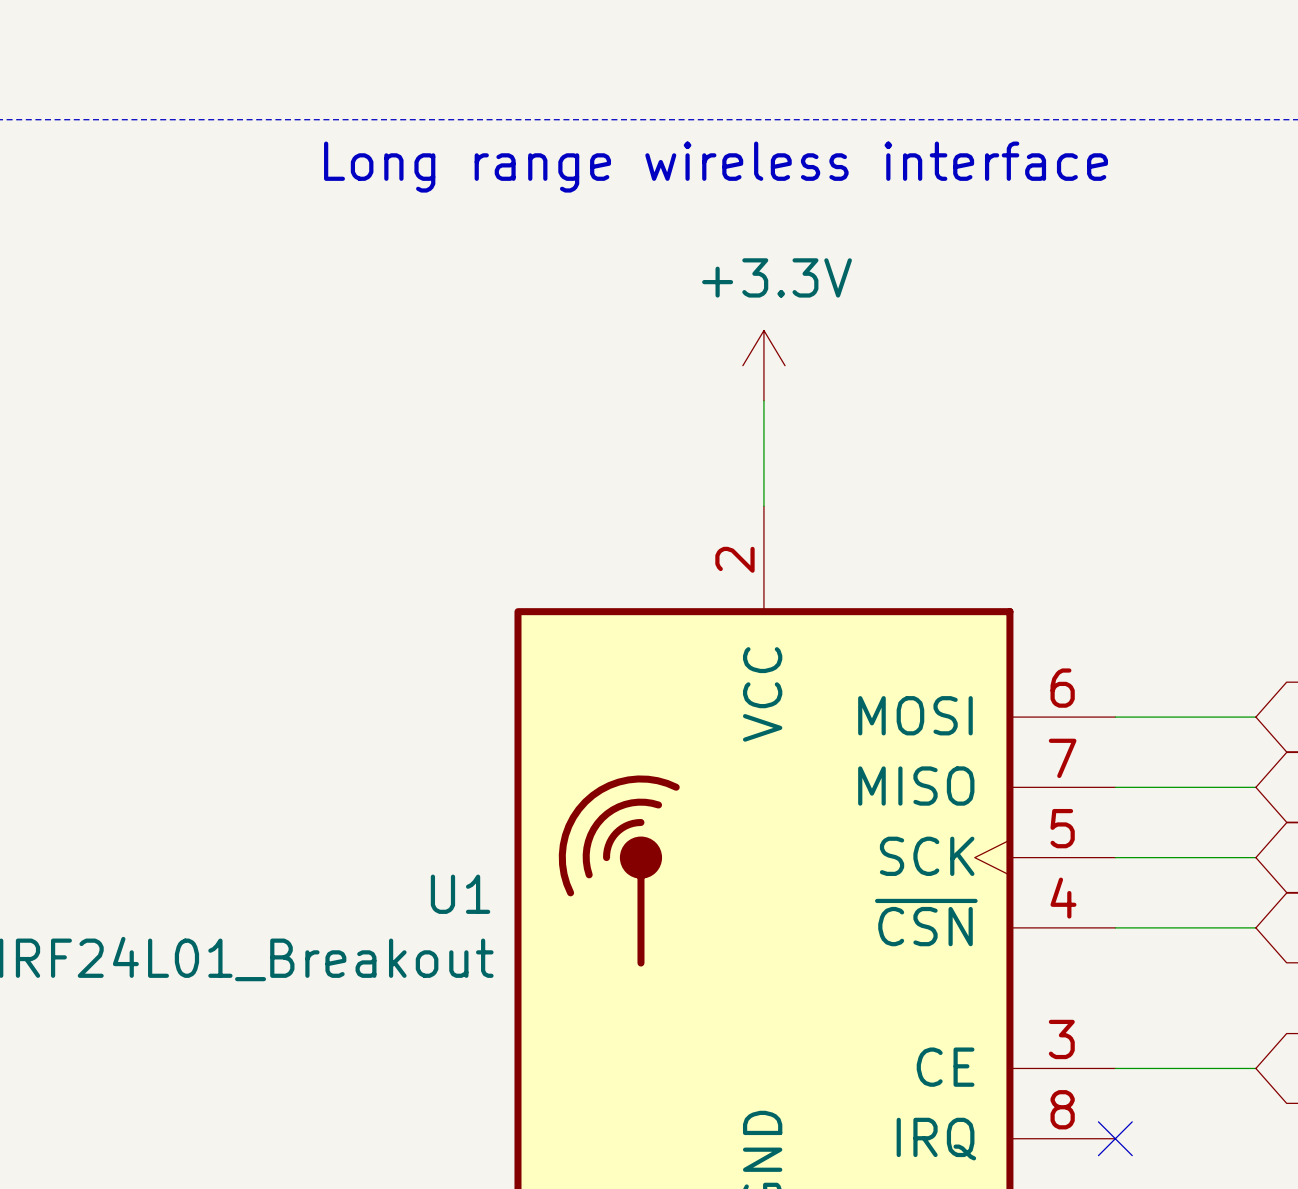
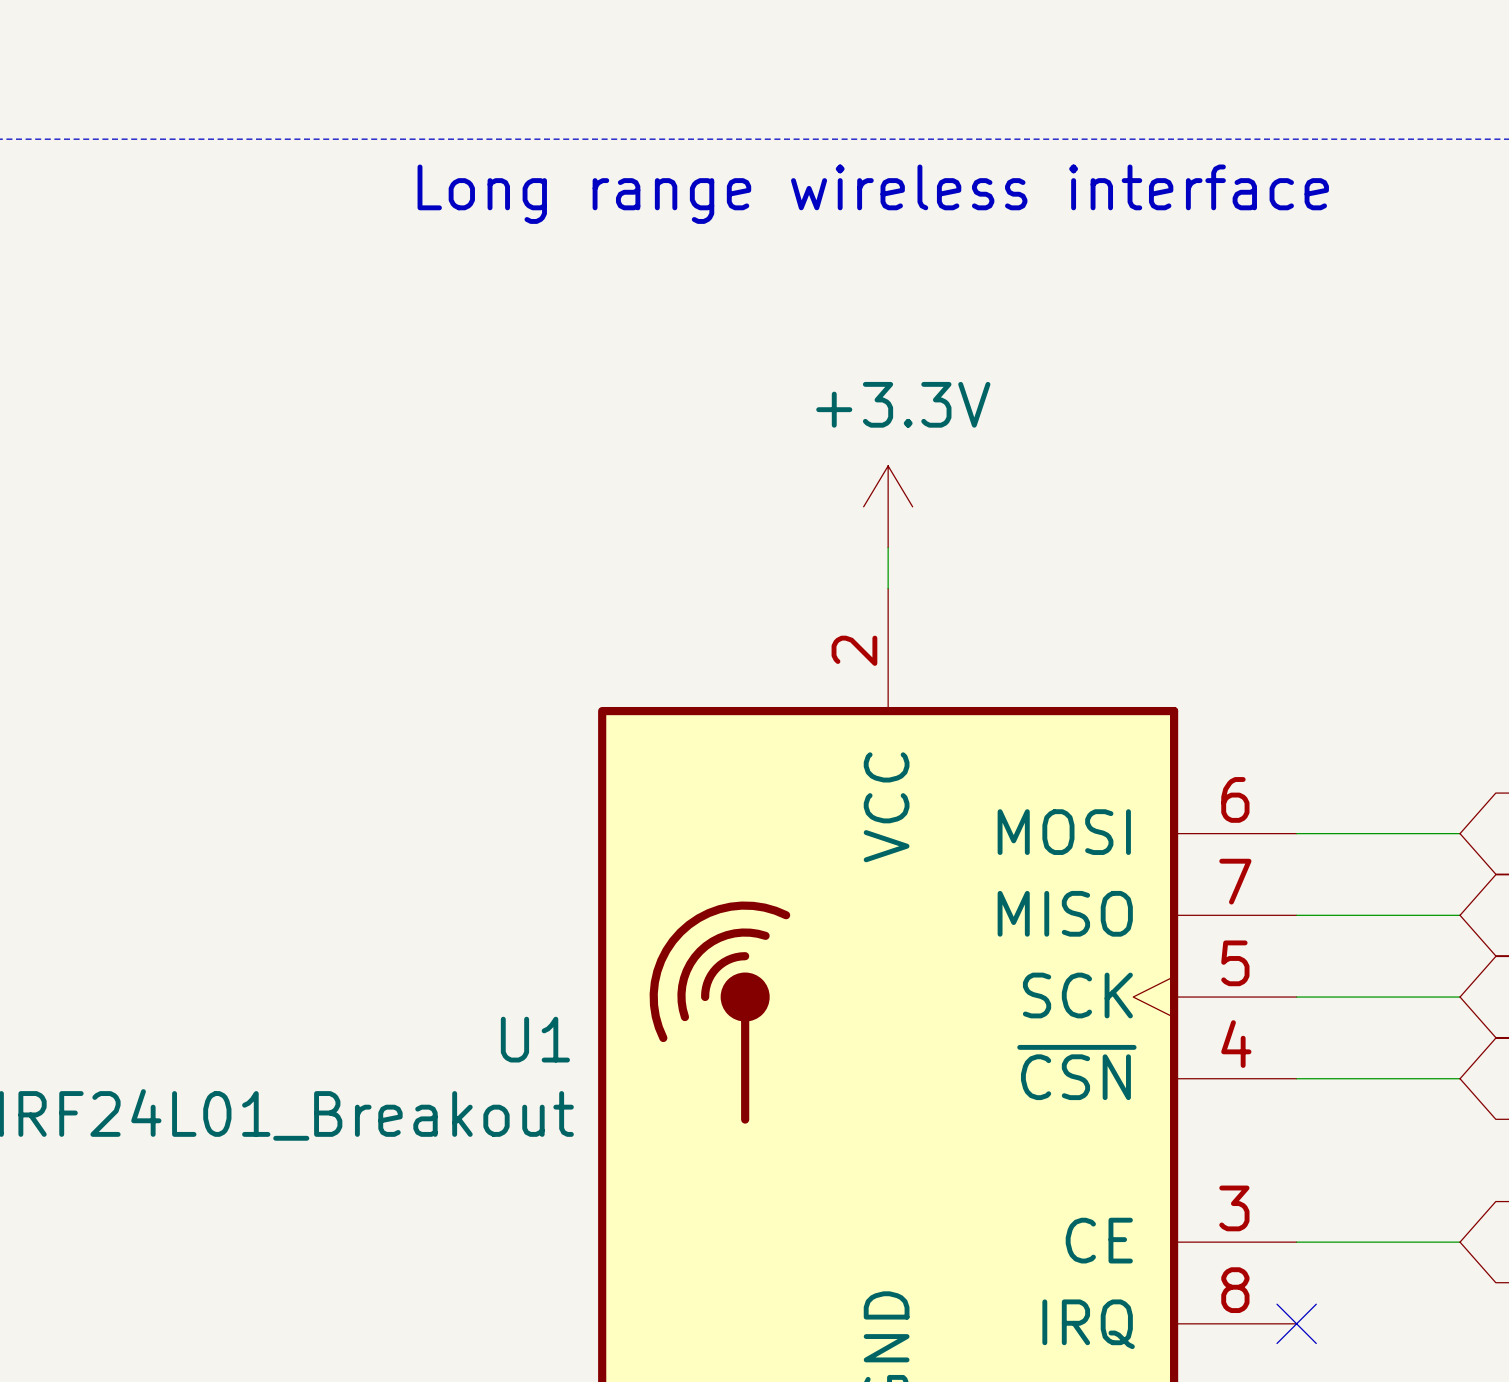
text position: Long range wireless interface (716, 167) -> Long range wireless interface (873, 194)
power symbol position: +3.3V (763, 365) -> +3.3V (888, 506)

